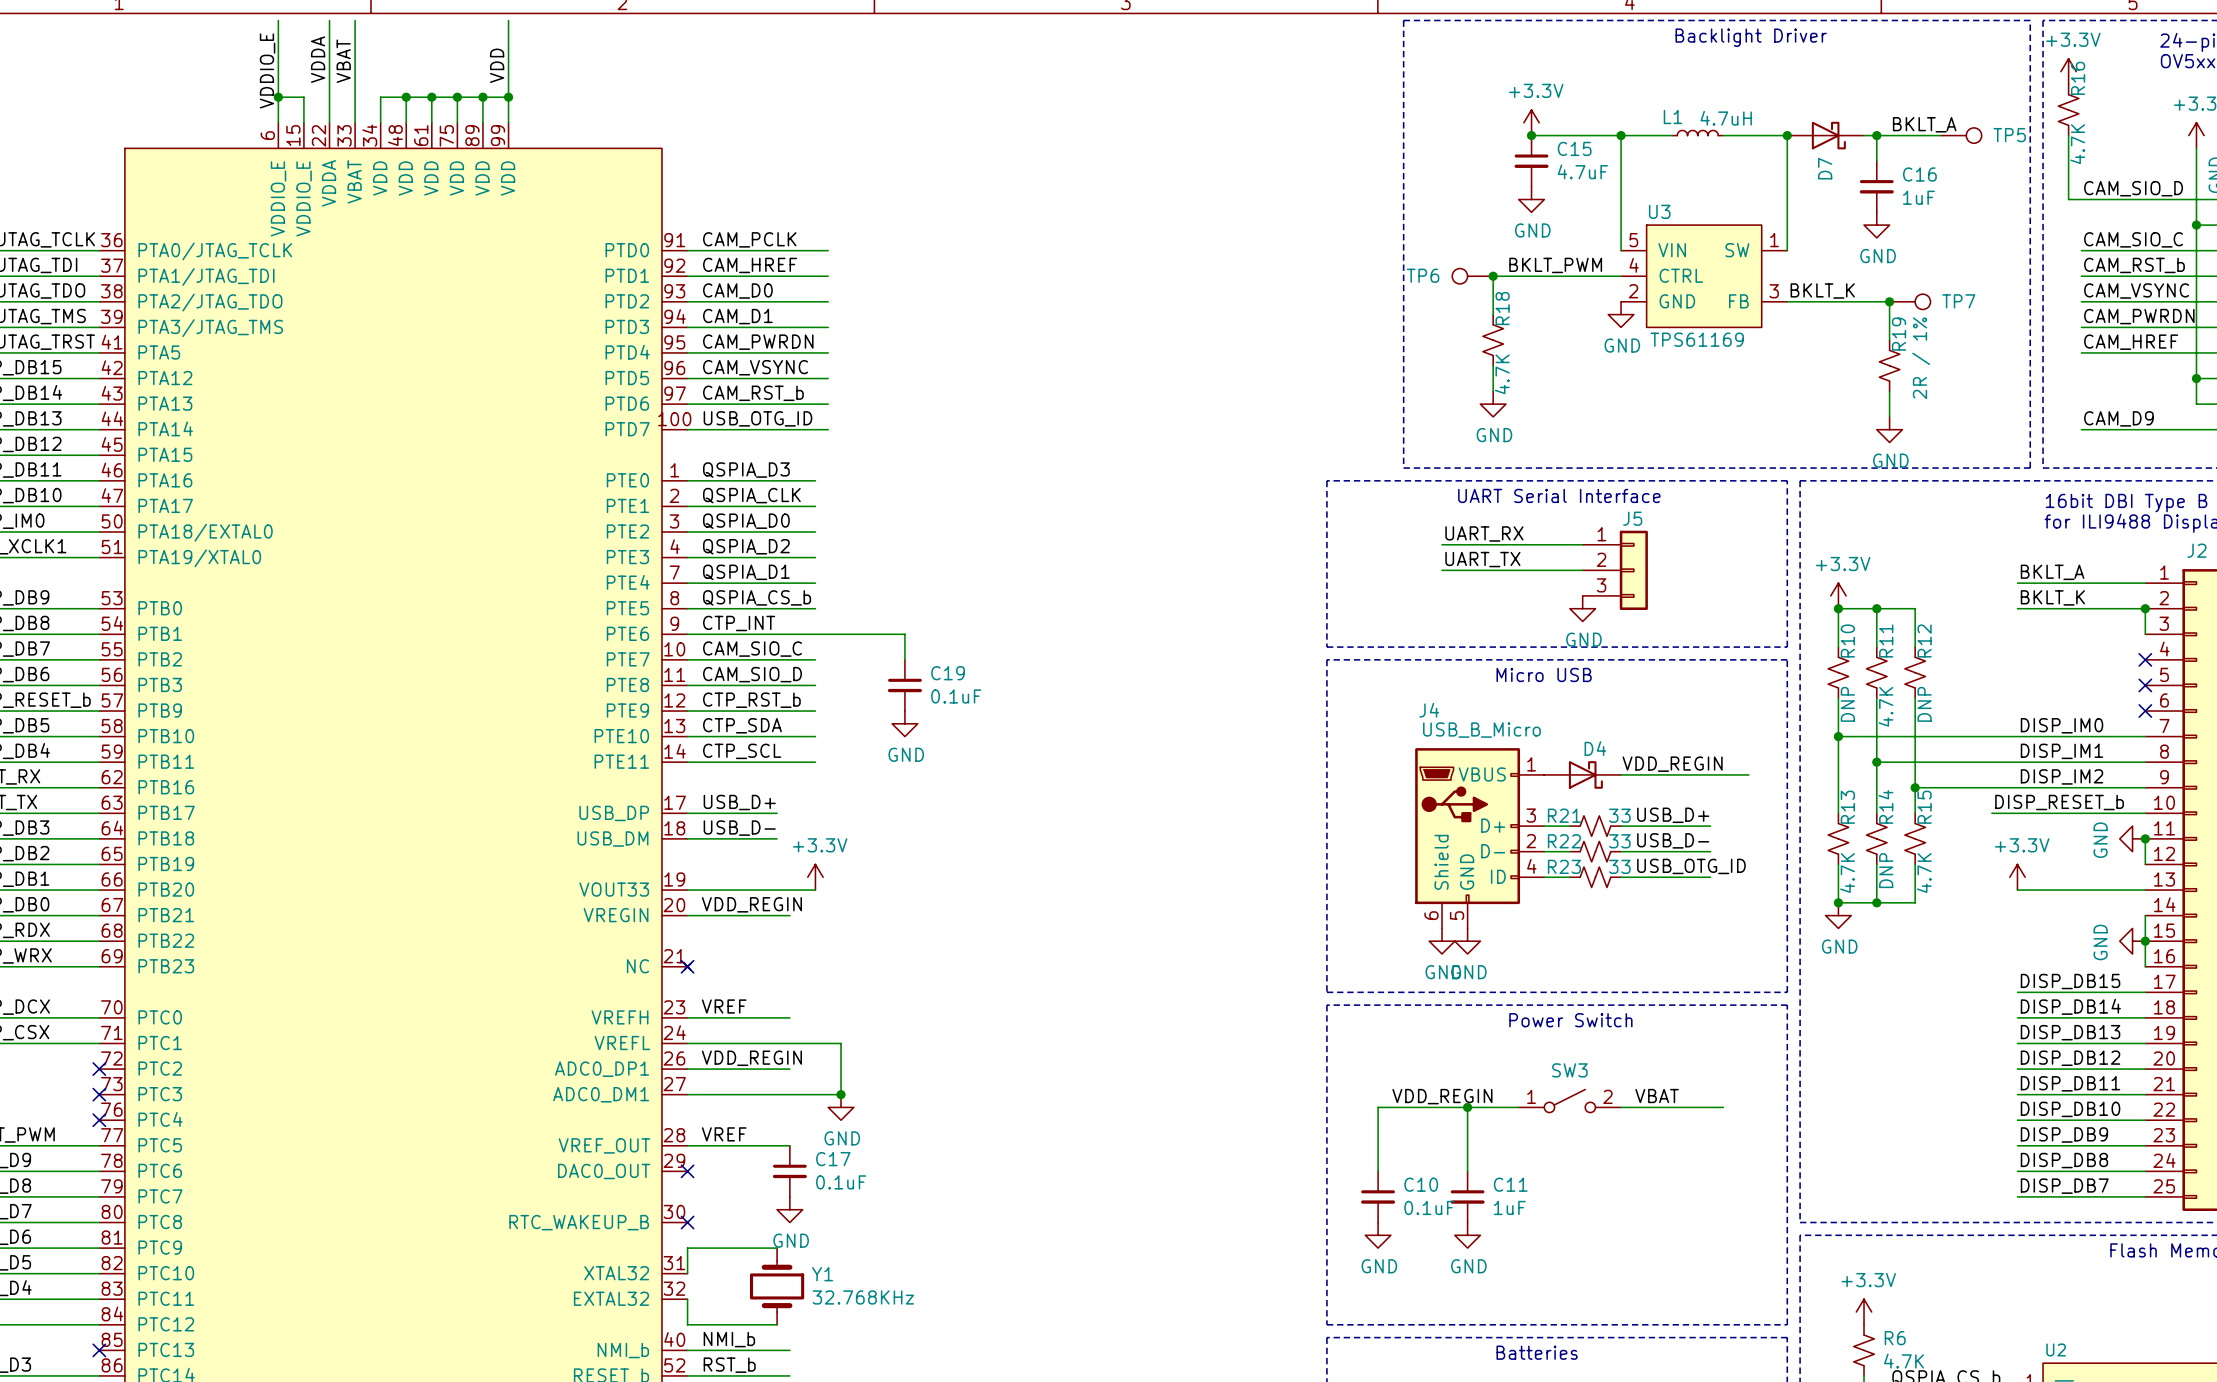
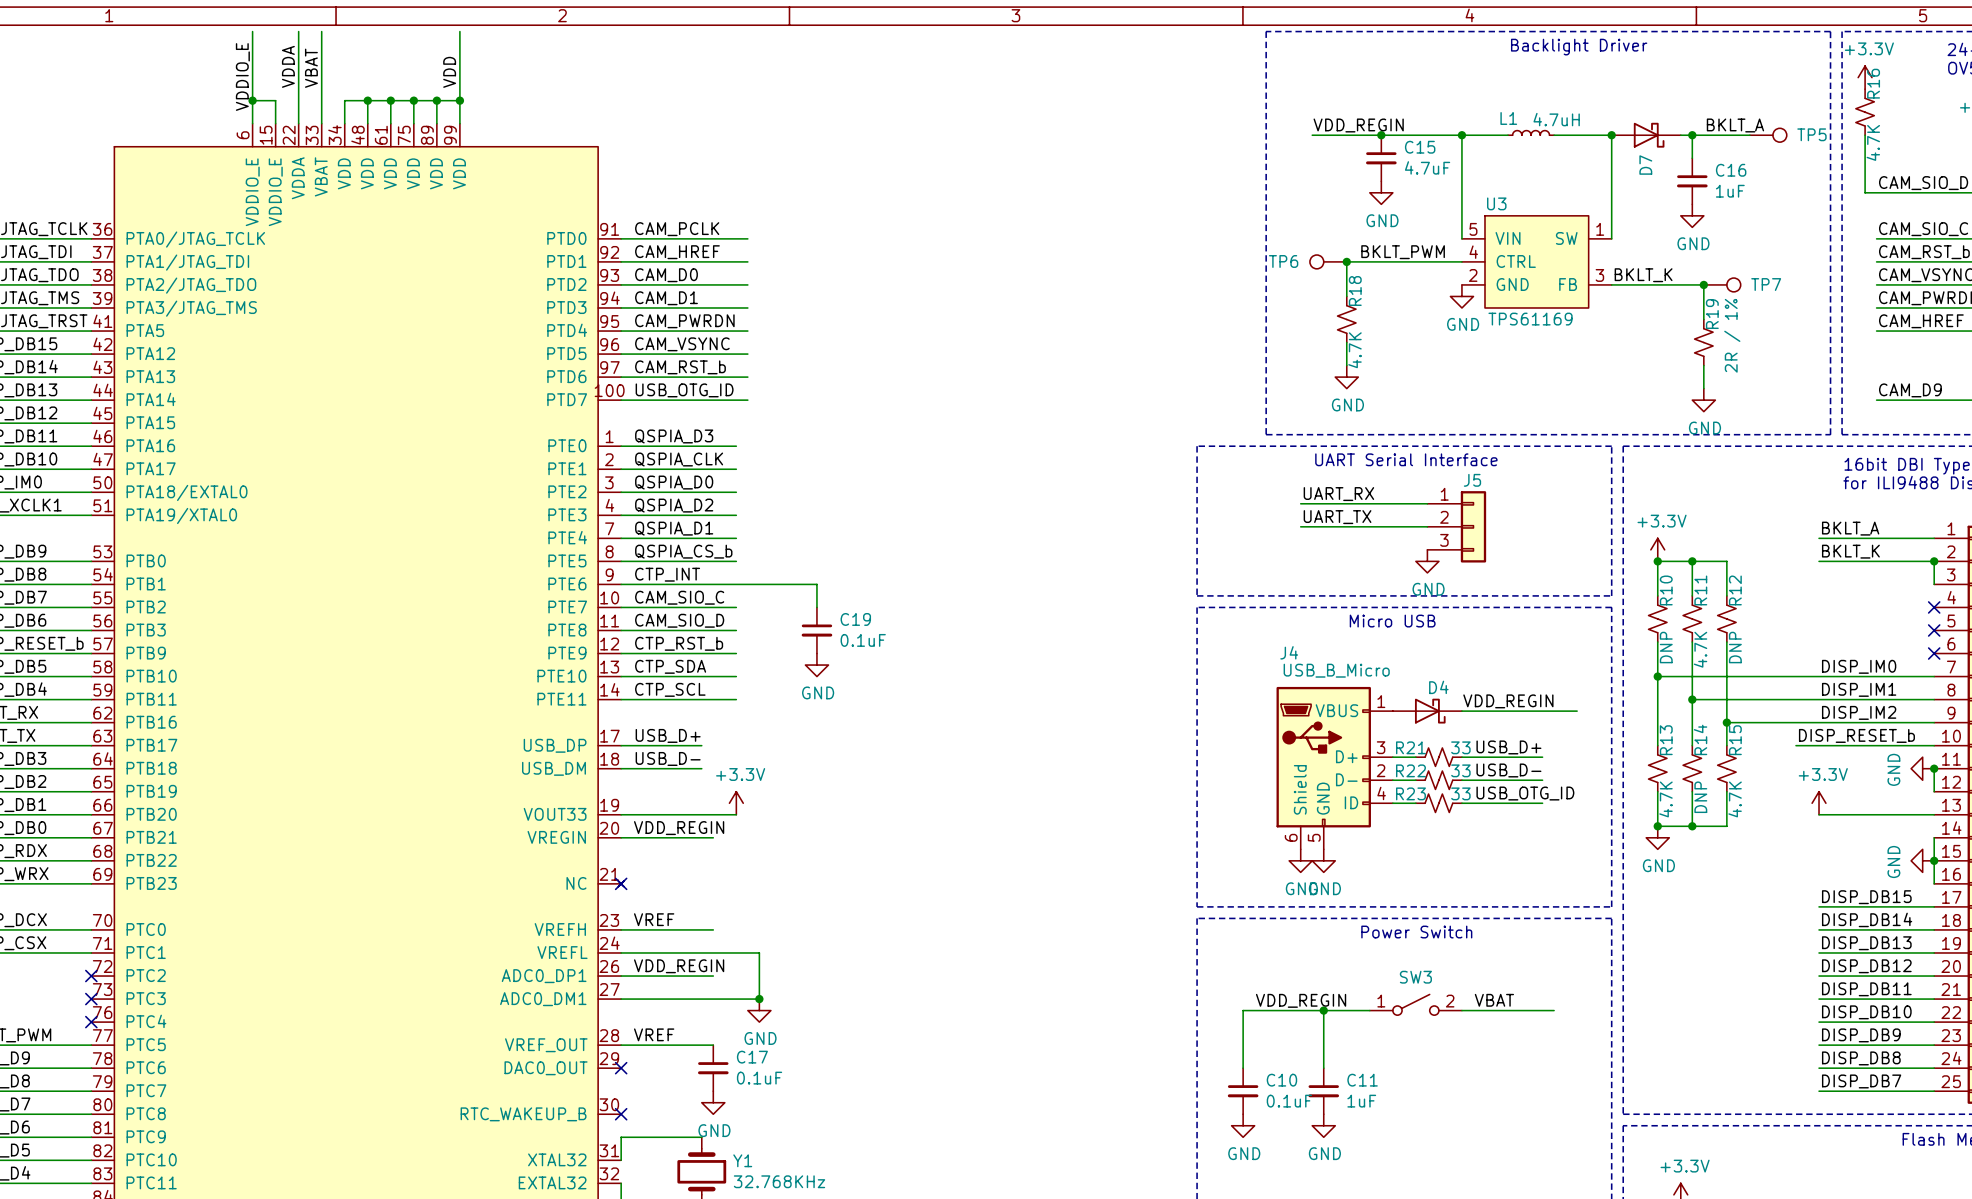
power symbol: +3.3V (1531, 122) -> none
label: none -> VDD_REGIN (1358, 125)
wire: none -> (1312, 135) (1381, 135)

